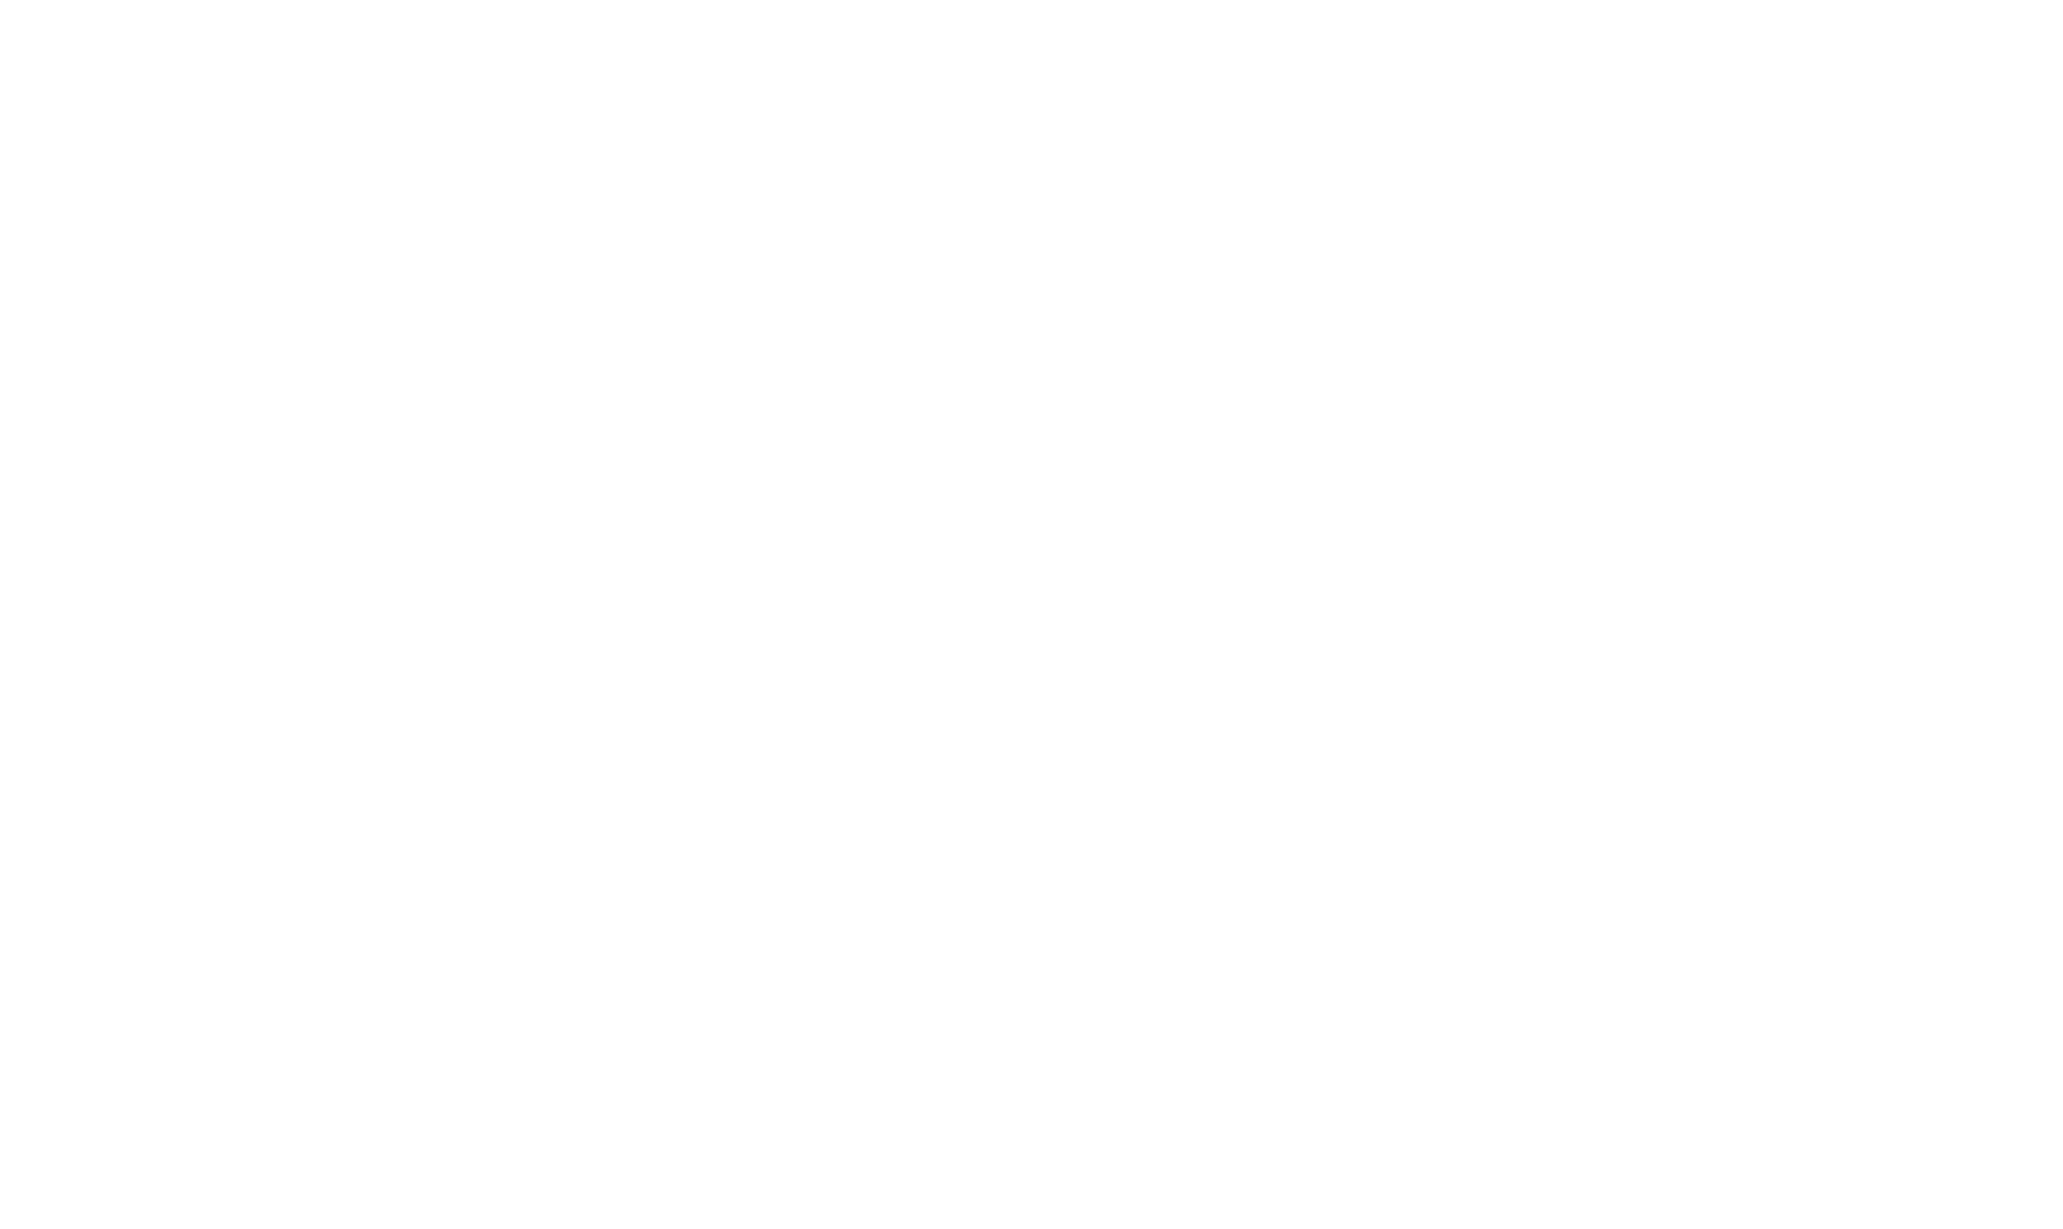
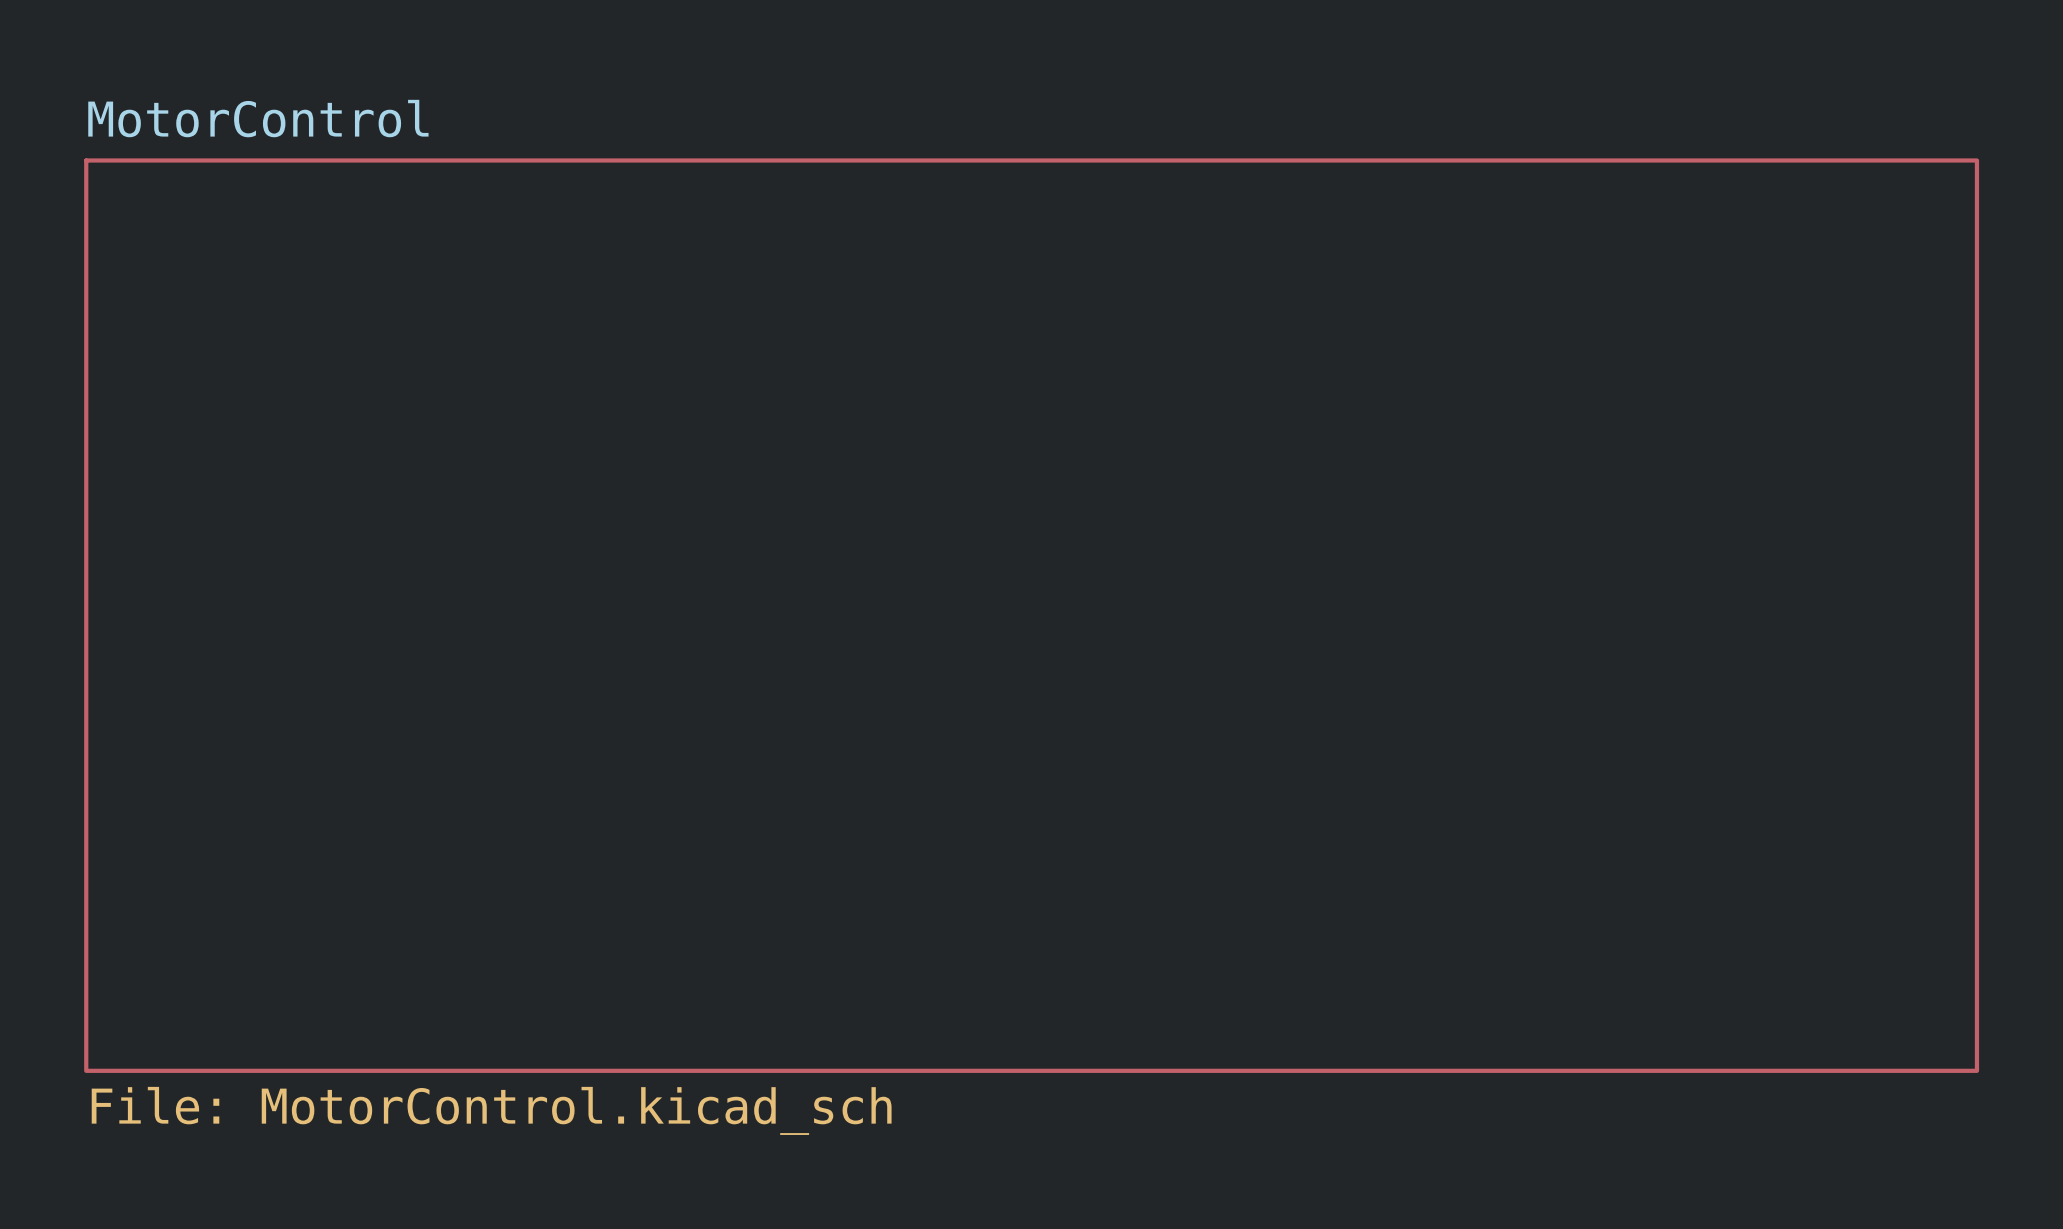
sheet MotorControl: none -> File: MotorControl.kicad_sch (1031, 615)

